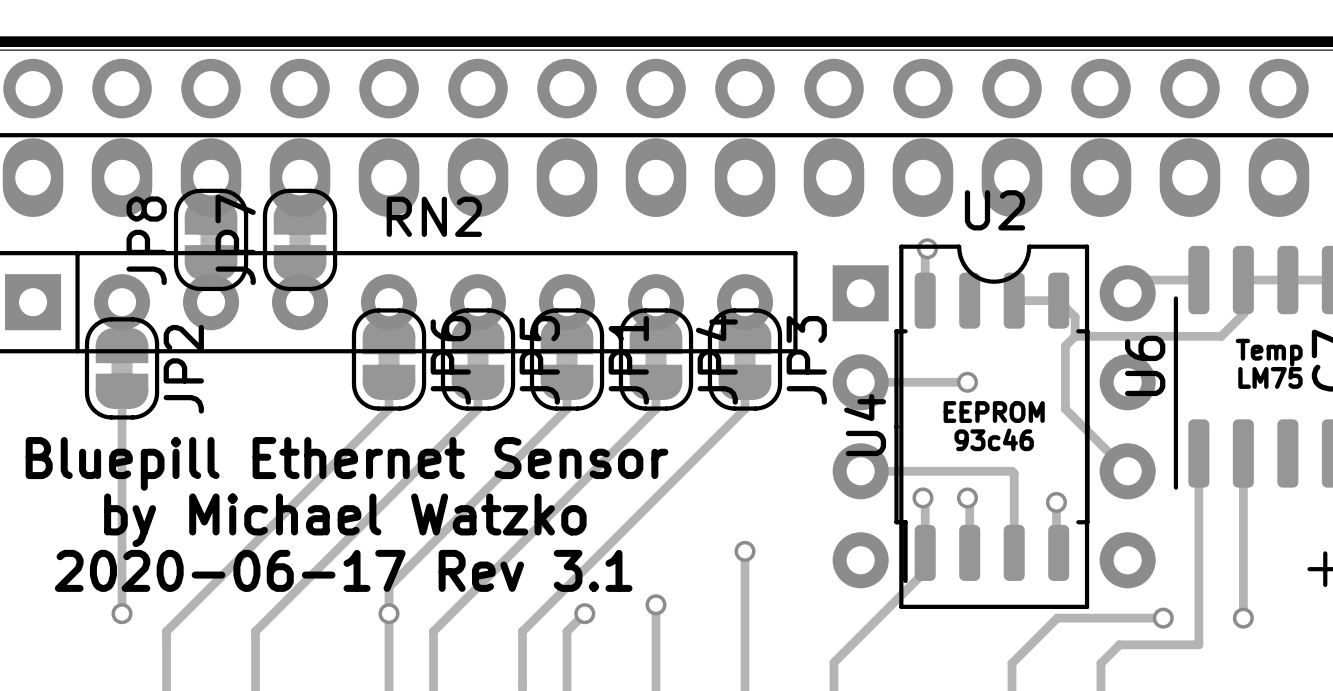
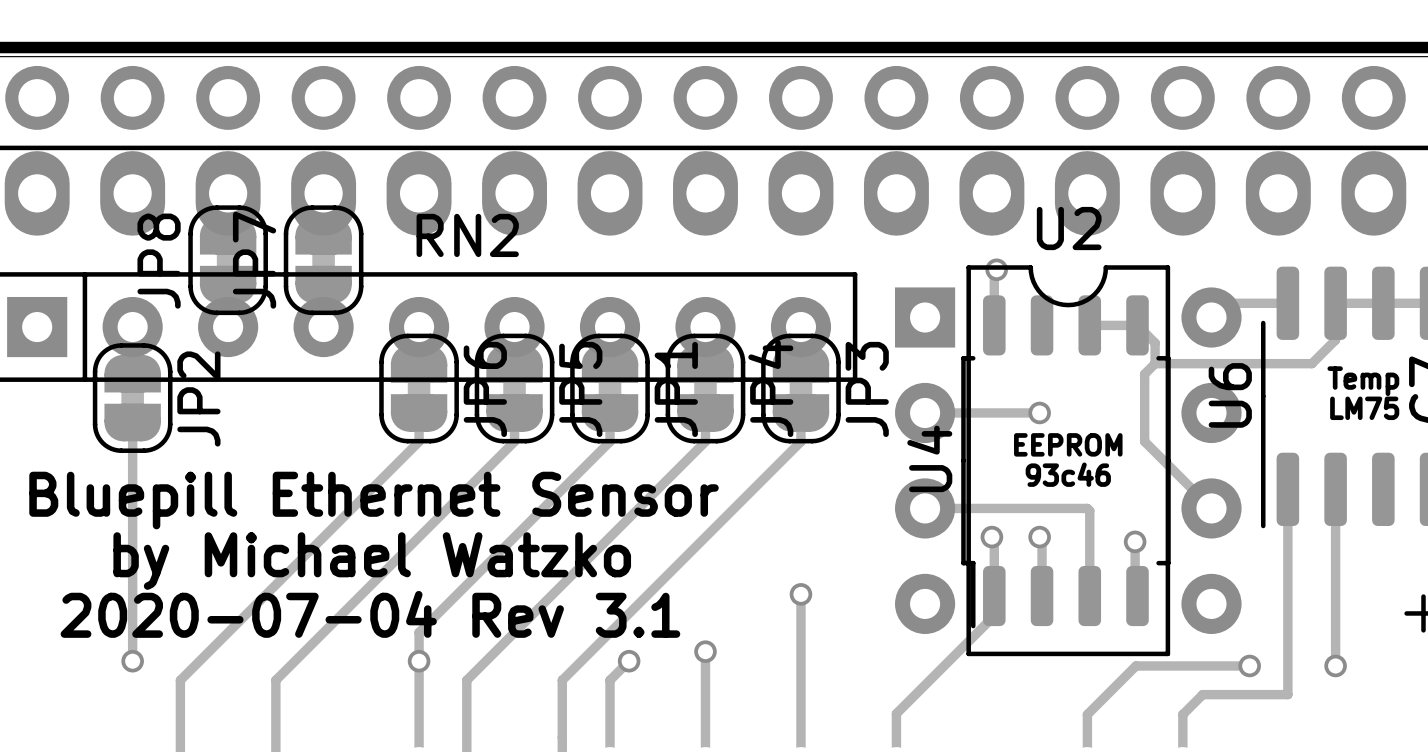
text: 2020-06-17 Rev 3.1 (343, 570) -> 2020-07-04 Rev 3.1 (370, 614)

